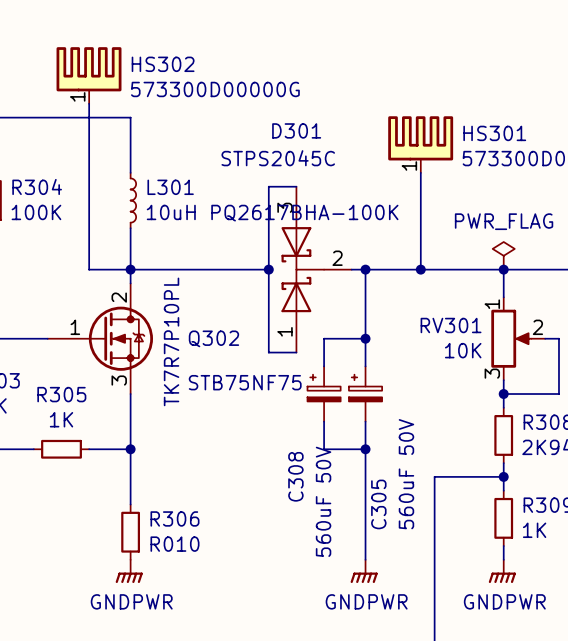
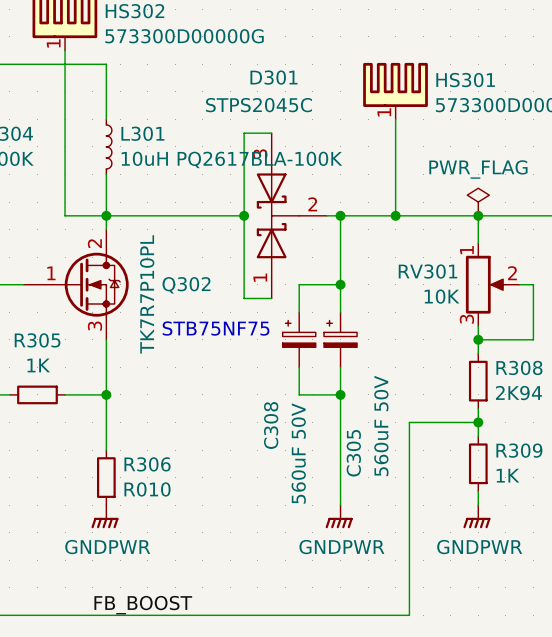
L301 value: 10uH PQ2617BHA-100K (272, 213) -> 10uH PQ2617BLA-100K (231, 159)

